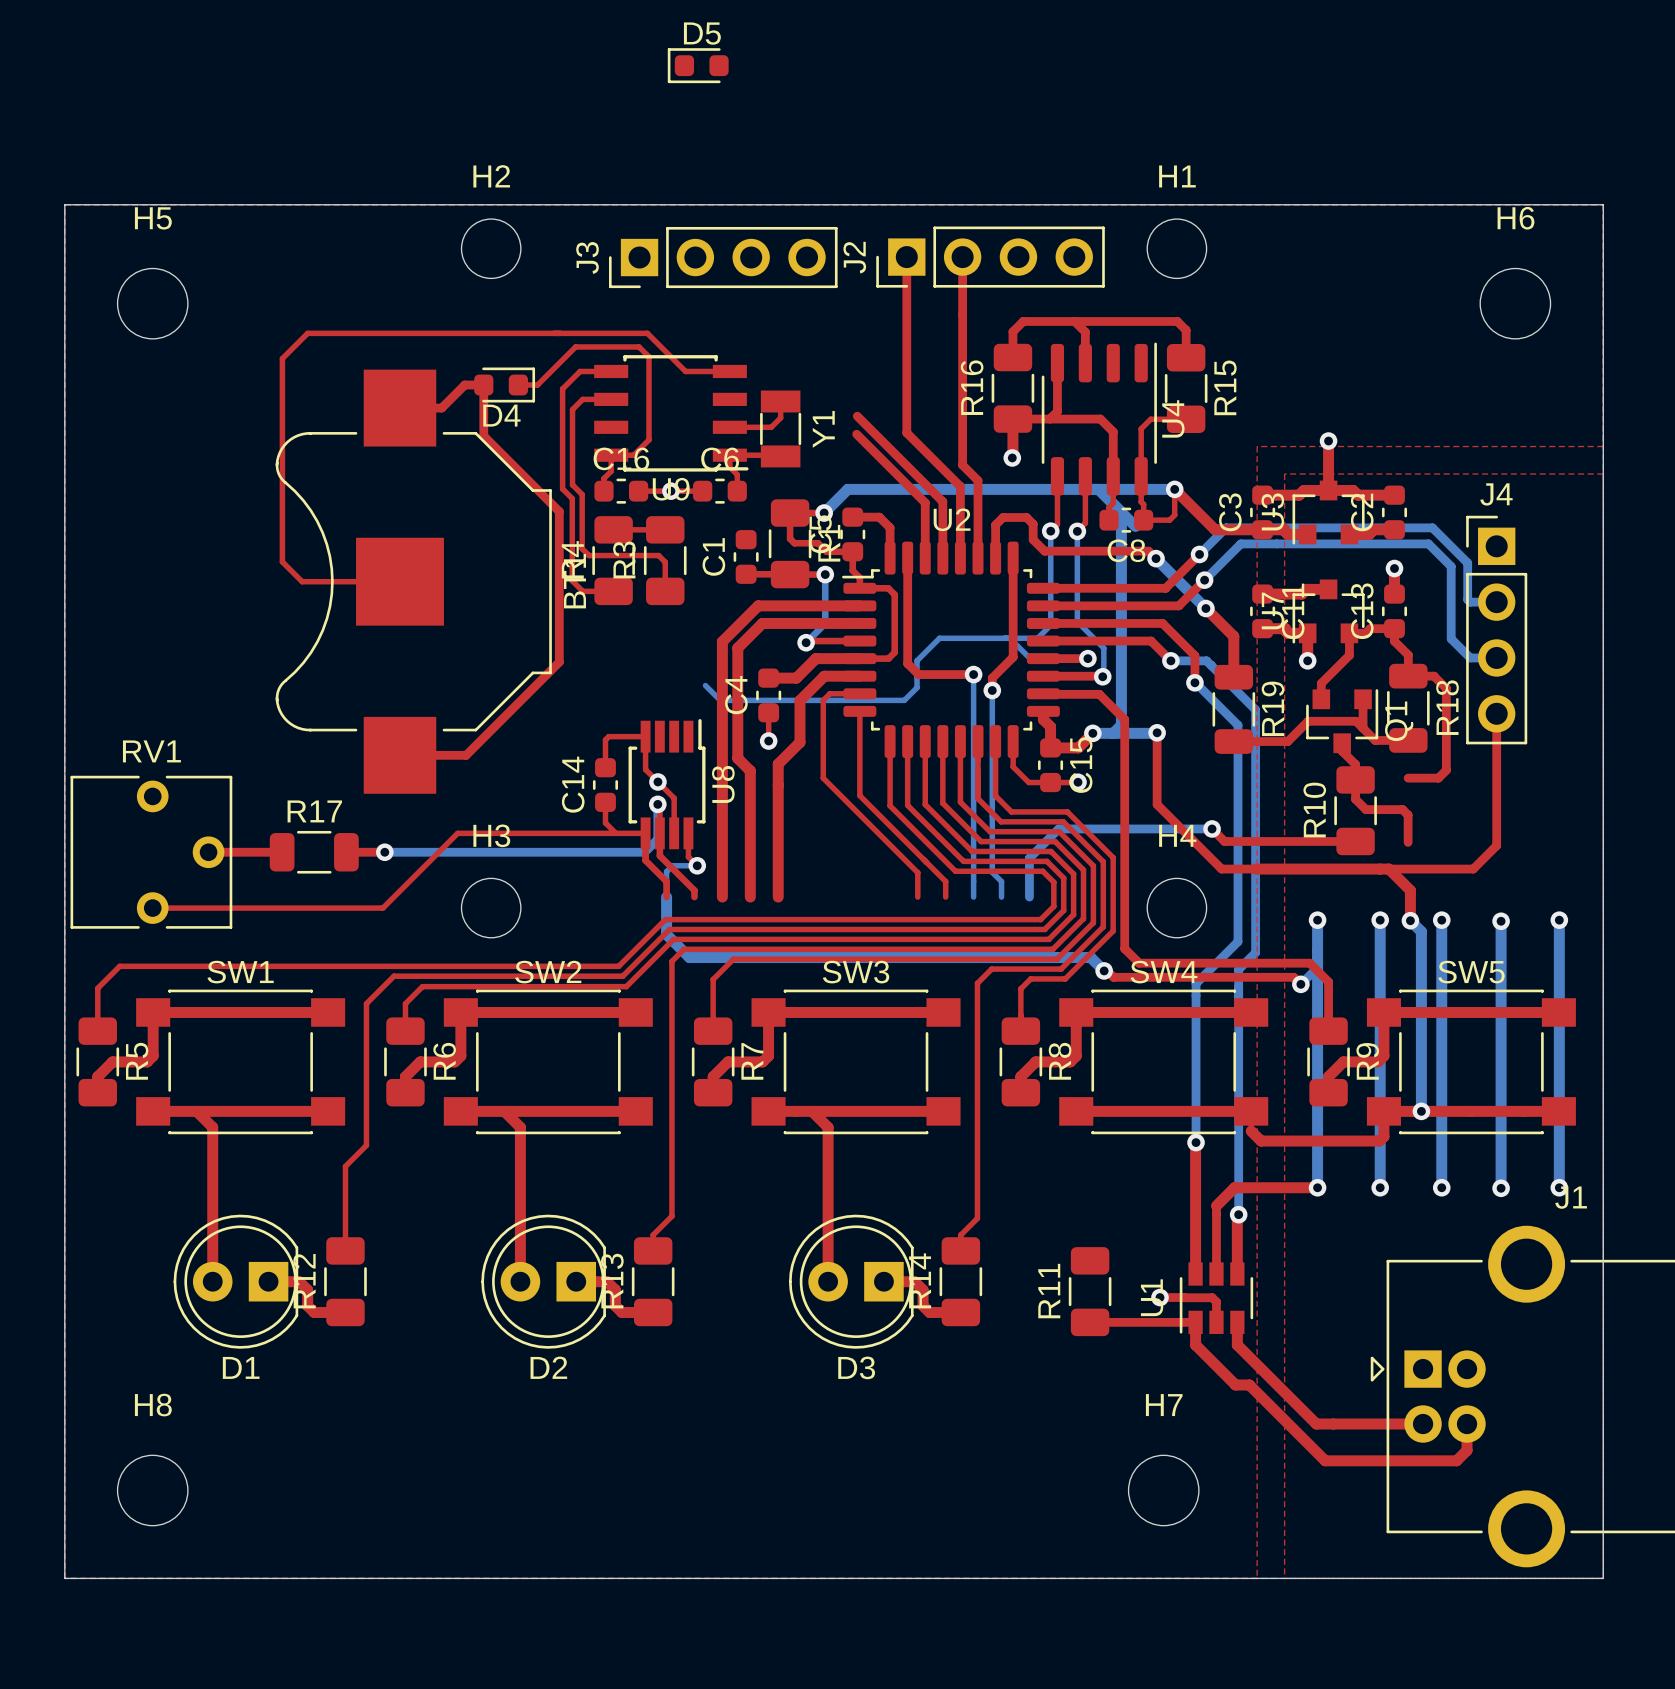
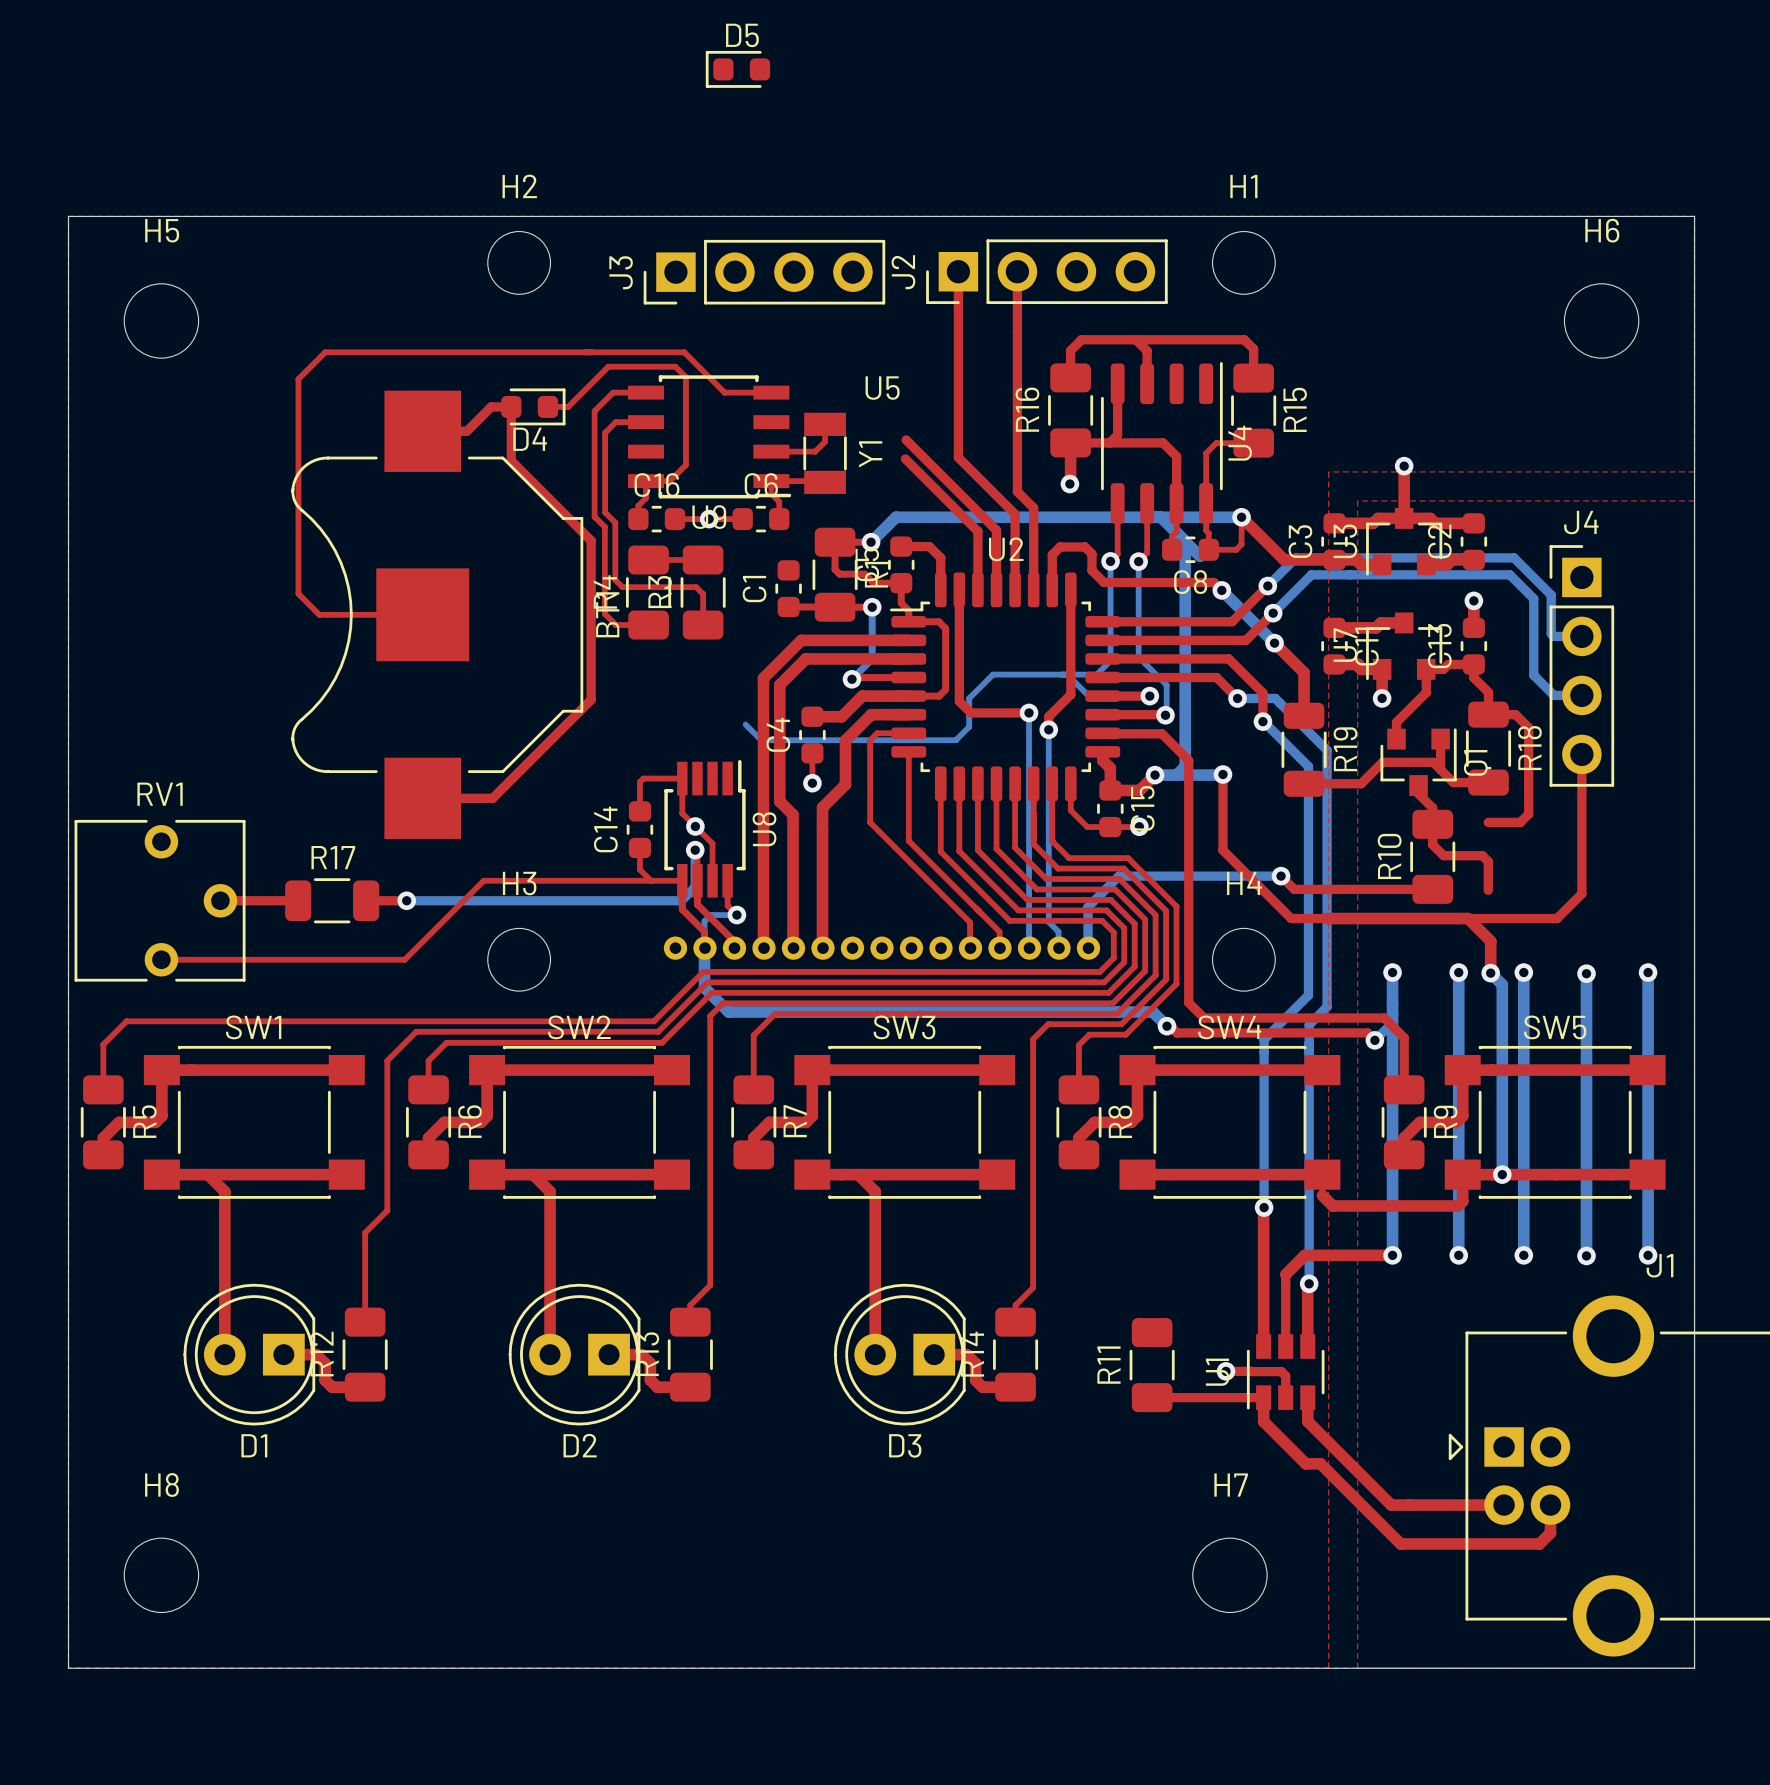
U5: none -> (881, 948)

